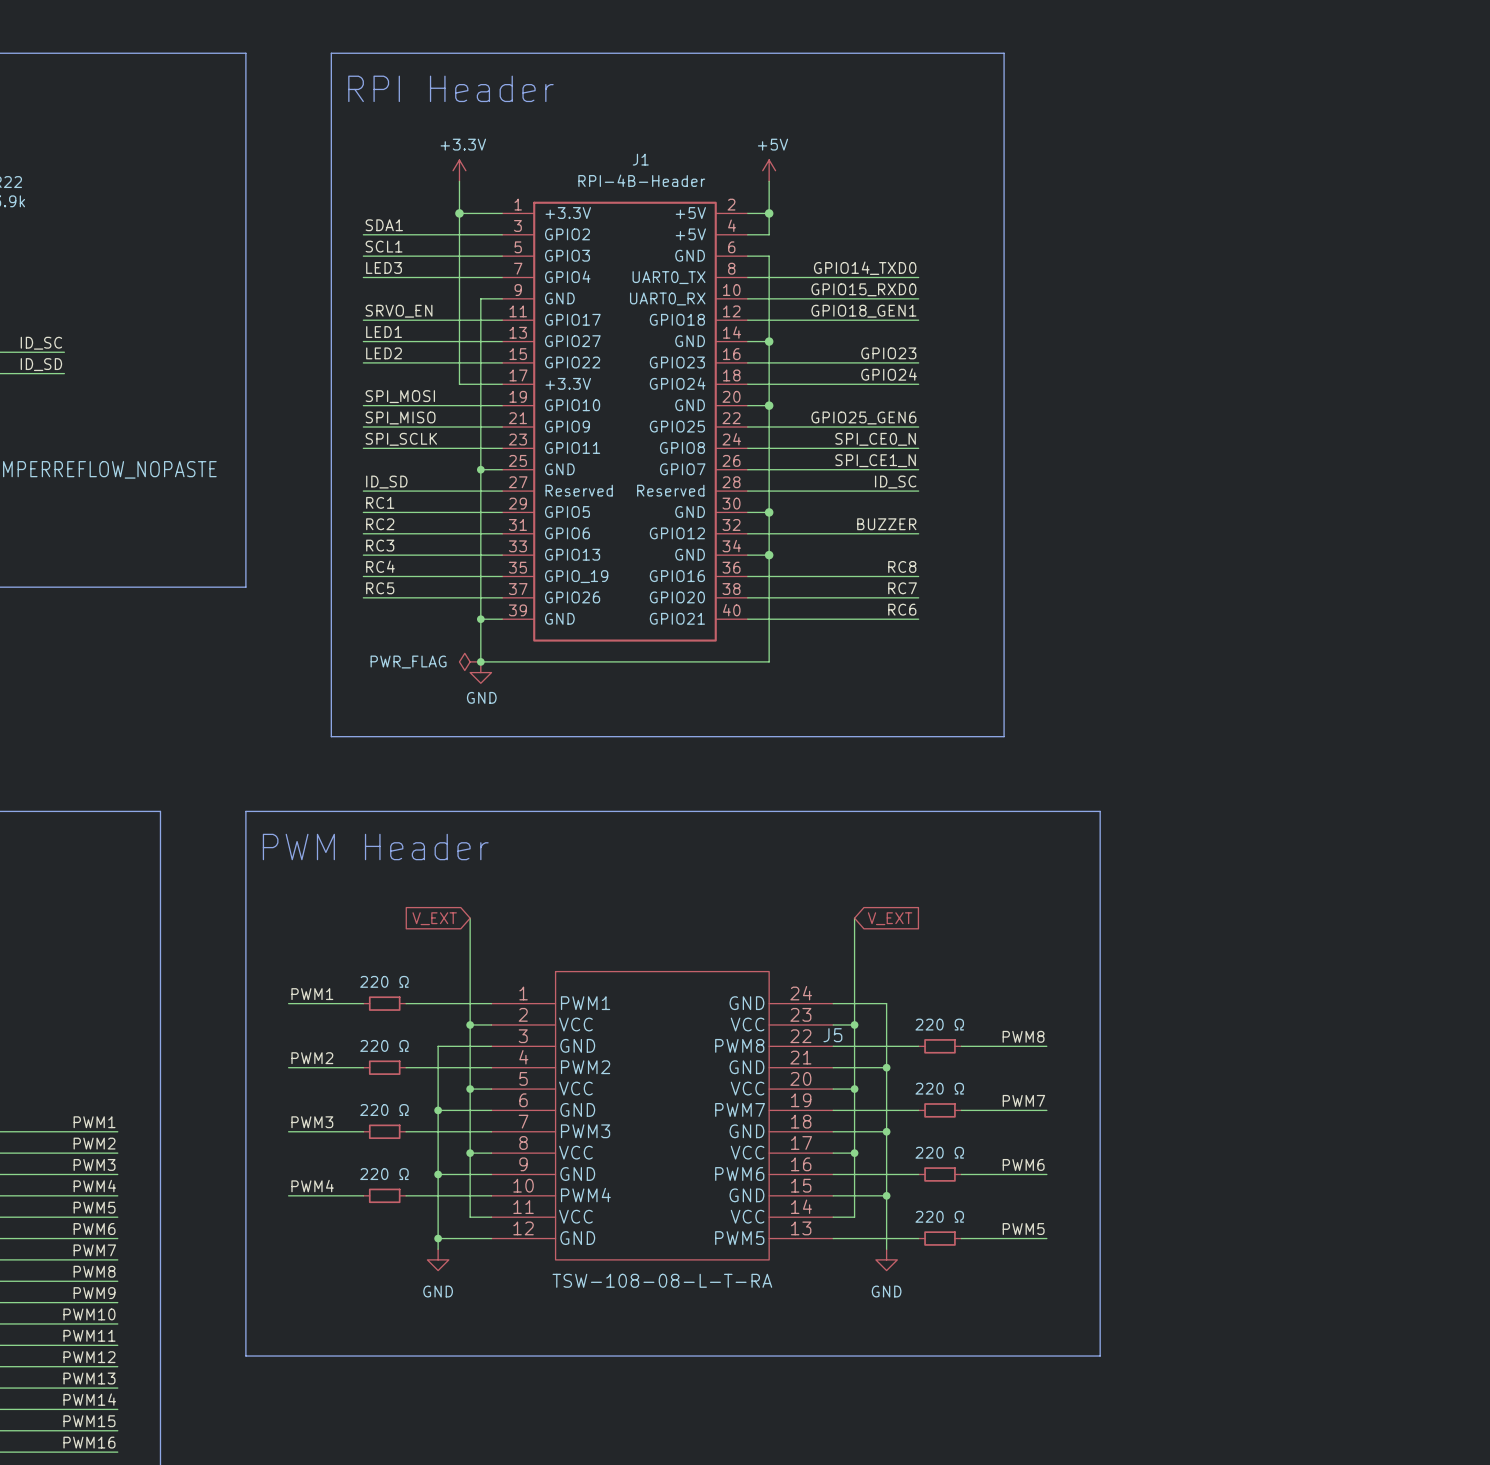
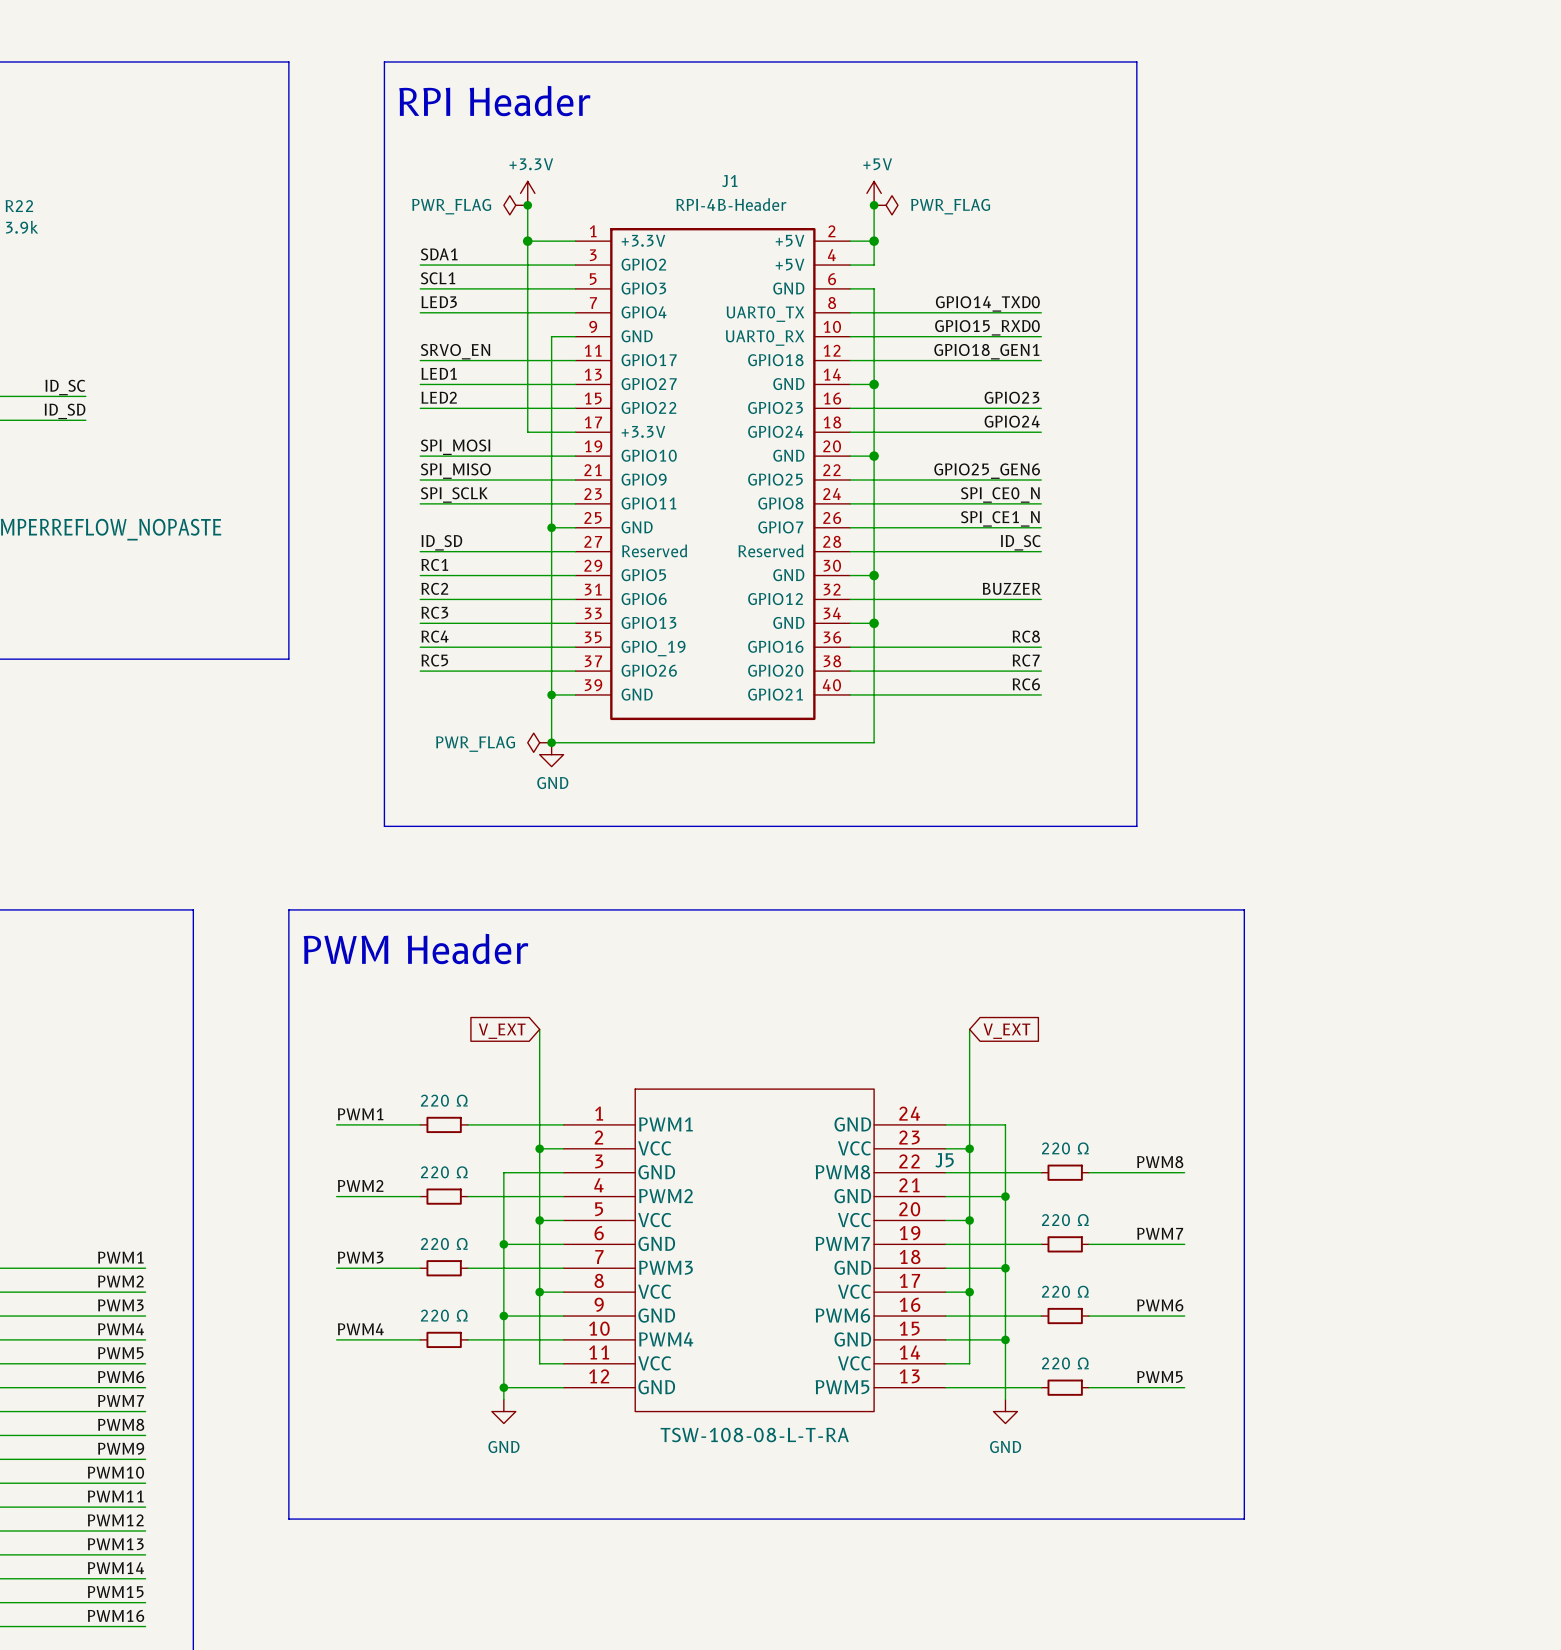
power symbol: none -> PWR_FLAG (515, 205)
junction: none -> (527, 205)
junction: none -> (874, 205)
power symbol: none -> PWR_FLAG (886, 205)

